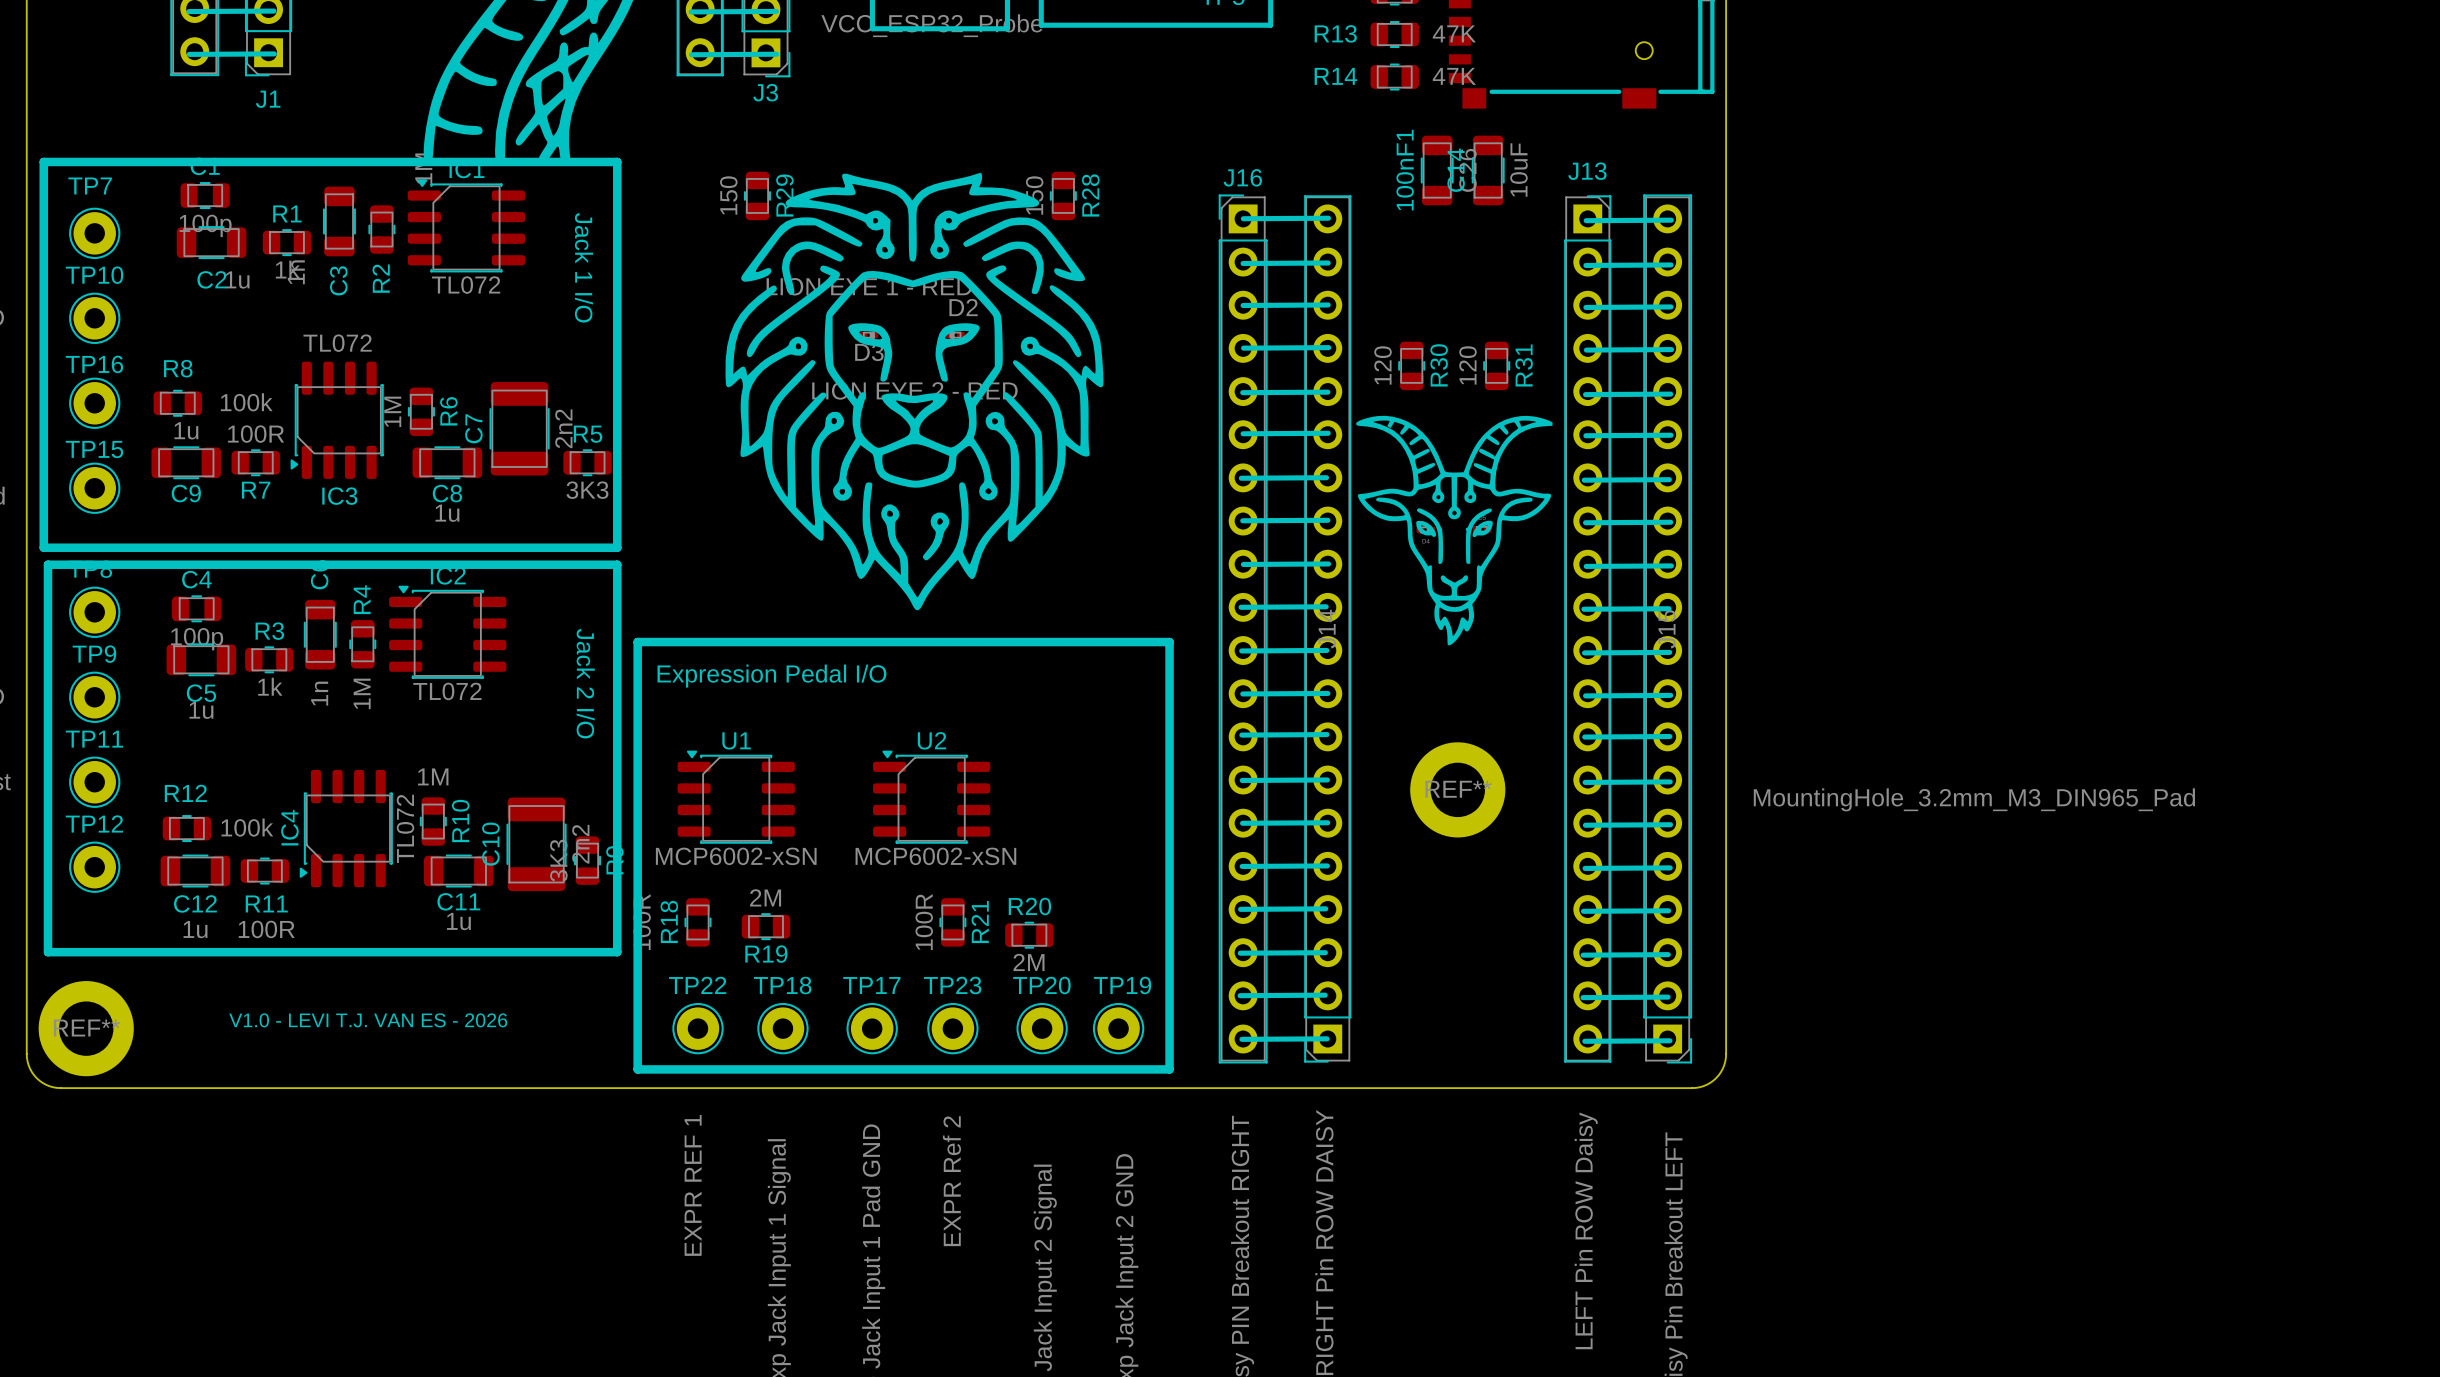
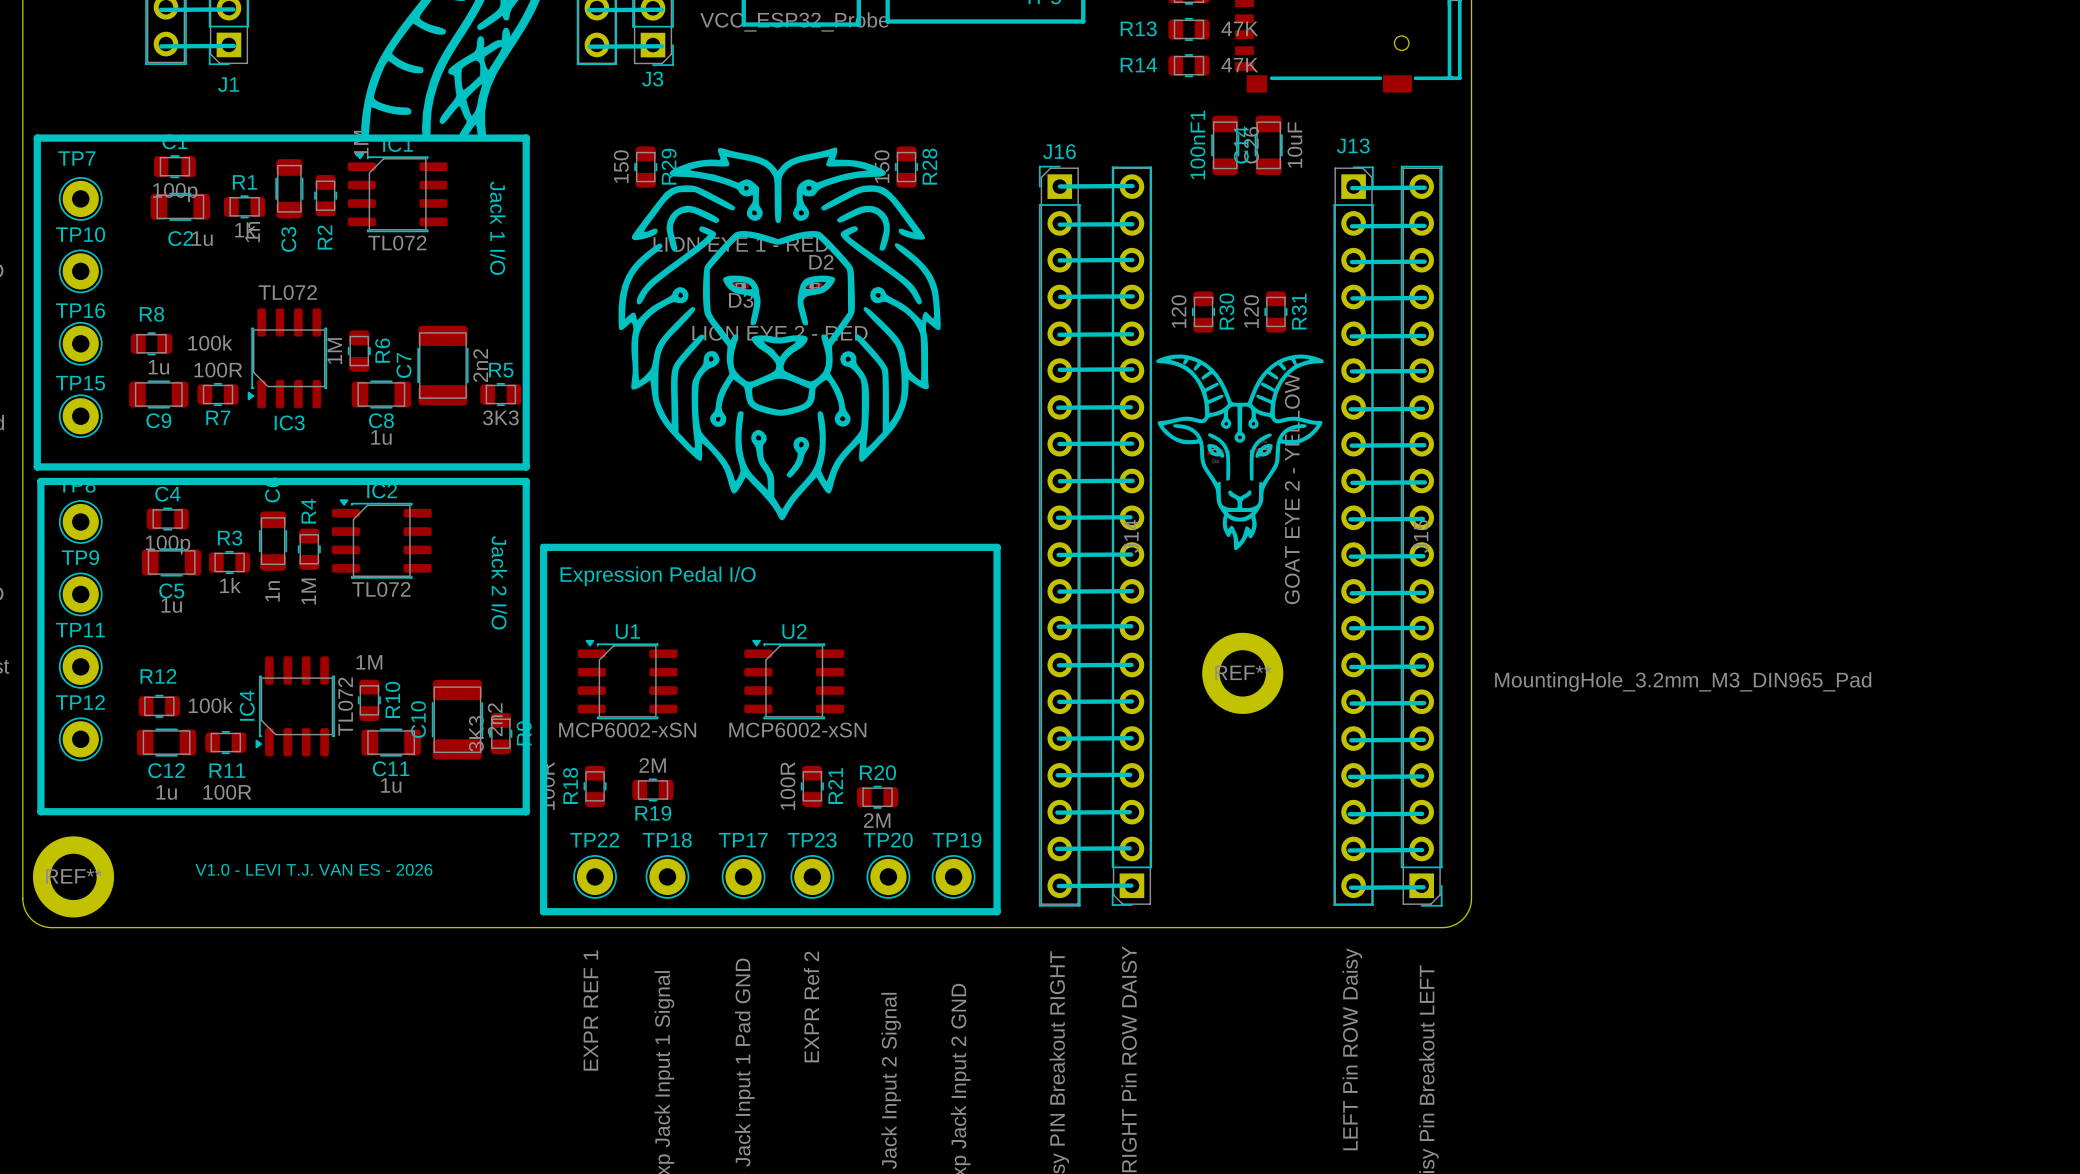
part value: none -> GOAT EYE 2 - YELLOW (1292, 488)

